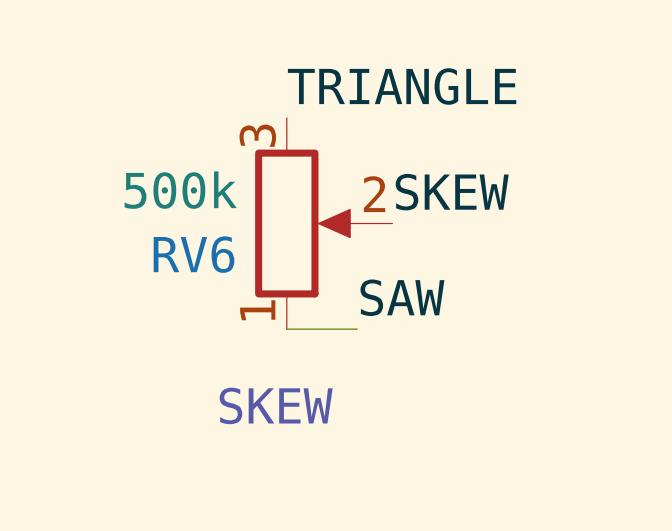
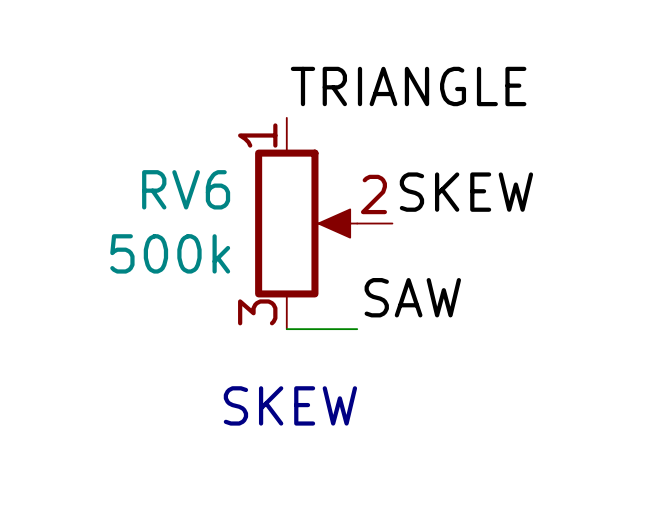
RV6 flip: as is (306, 223) -> up-down (306, 223)

